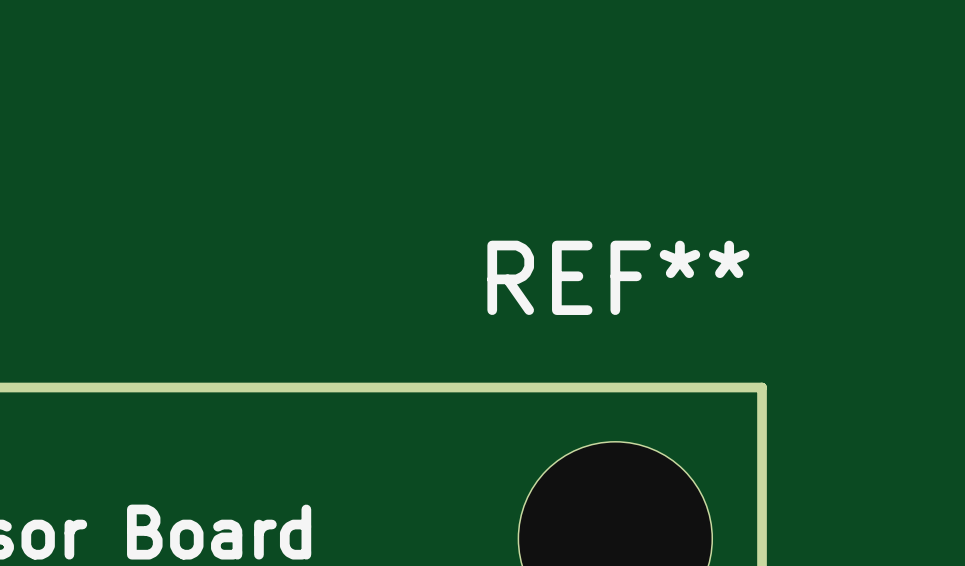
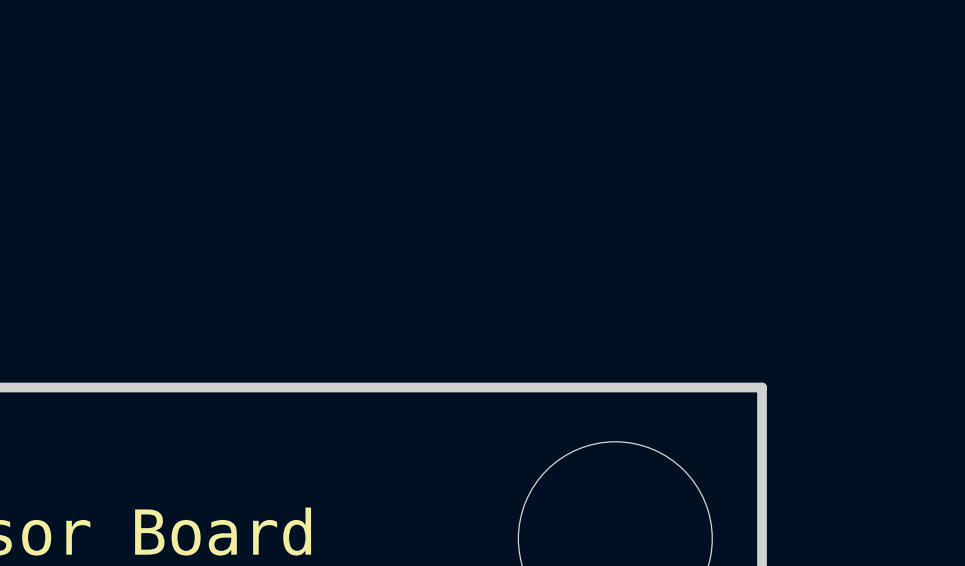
REF** name: REF** (618, 277) -> none

